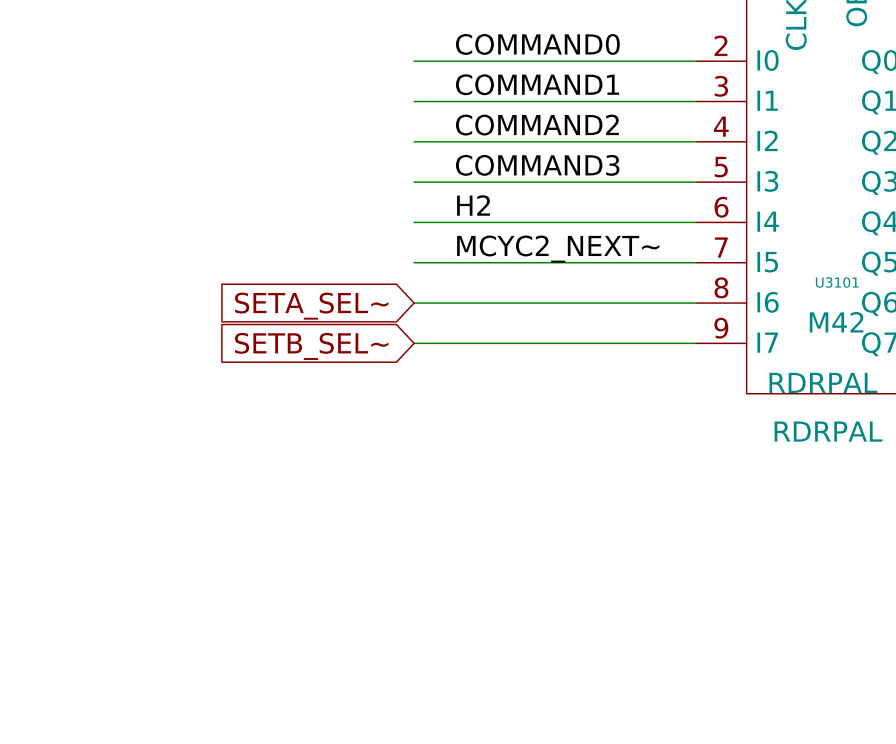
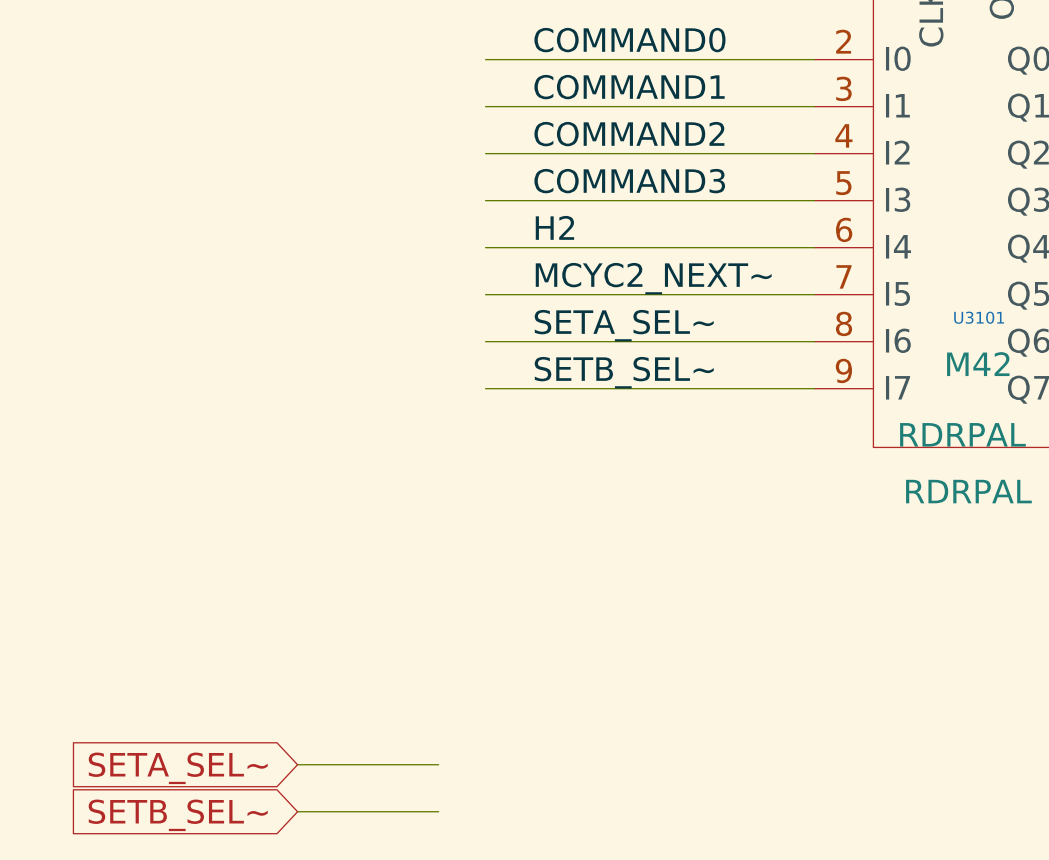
label: none -> SETA_SEL~ (624, 325)
global label: SETA_SEL~ (311, 306) -> none
label: none -> SETB_SEL~ (624, 372)
global label: SETB_SEL~ (311, 346) -> none
wire: none -> (297, 764) (438, 764)
global label: none -> SETA_SEL~ (178, 768)
wire: none -> (297, 811) (438, 811)
global label: none -> SETB_SEL~ (178, 815)

